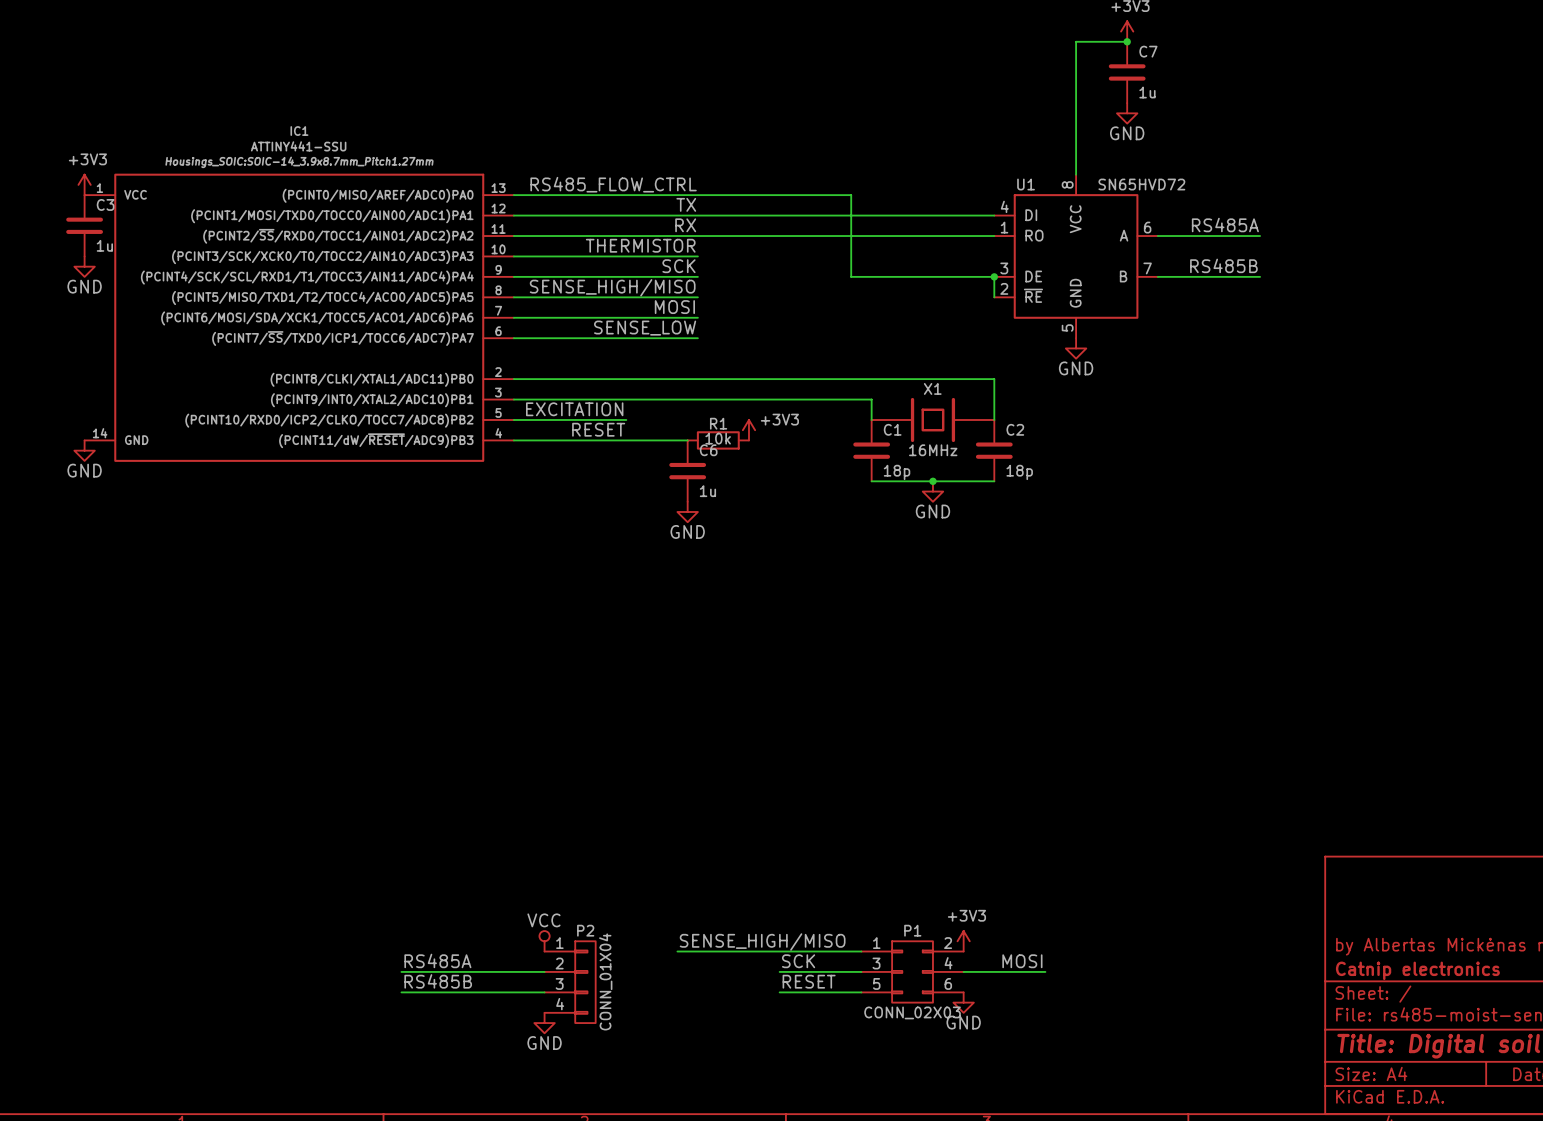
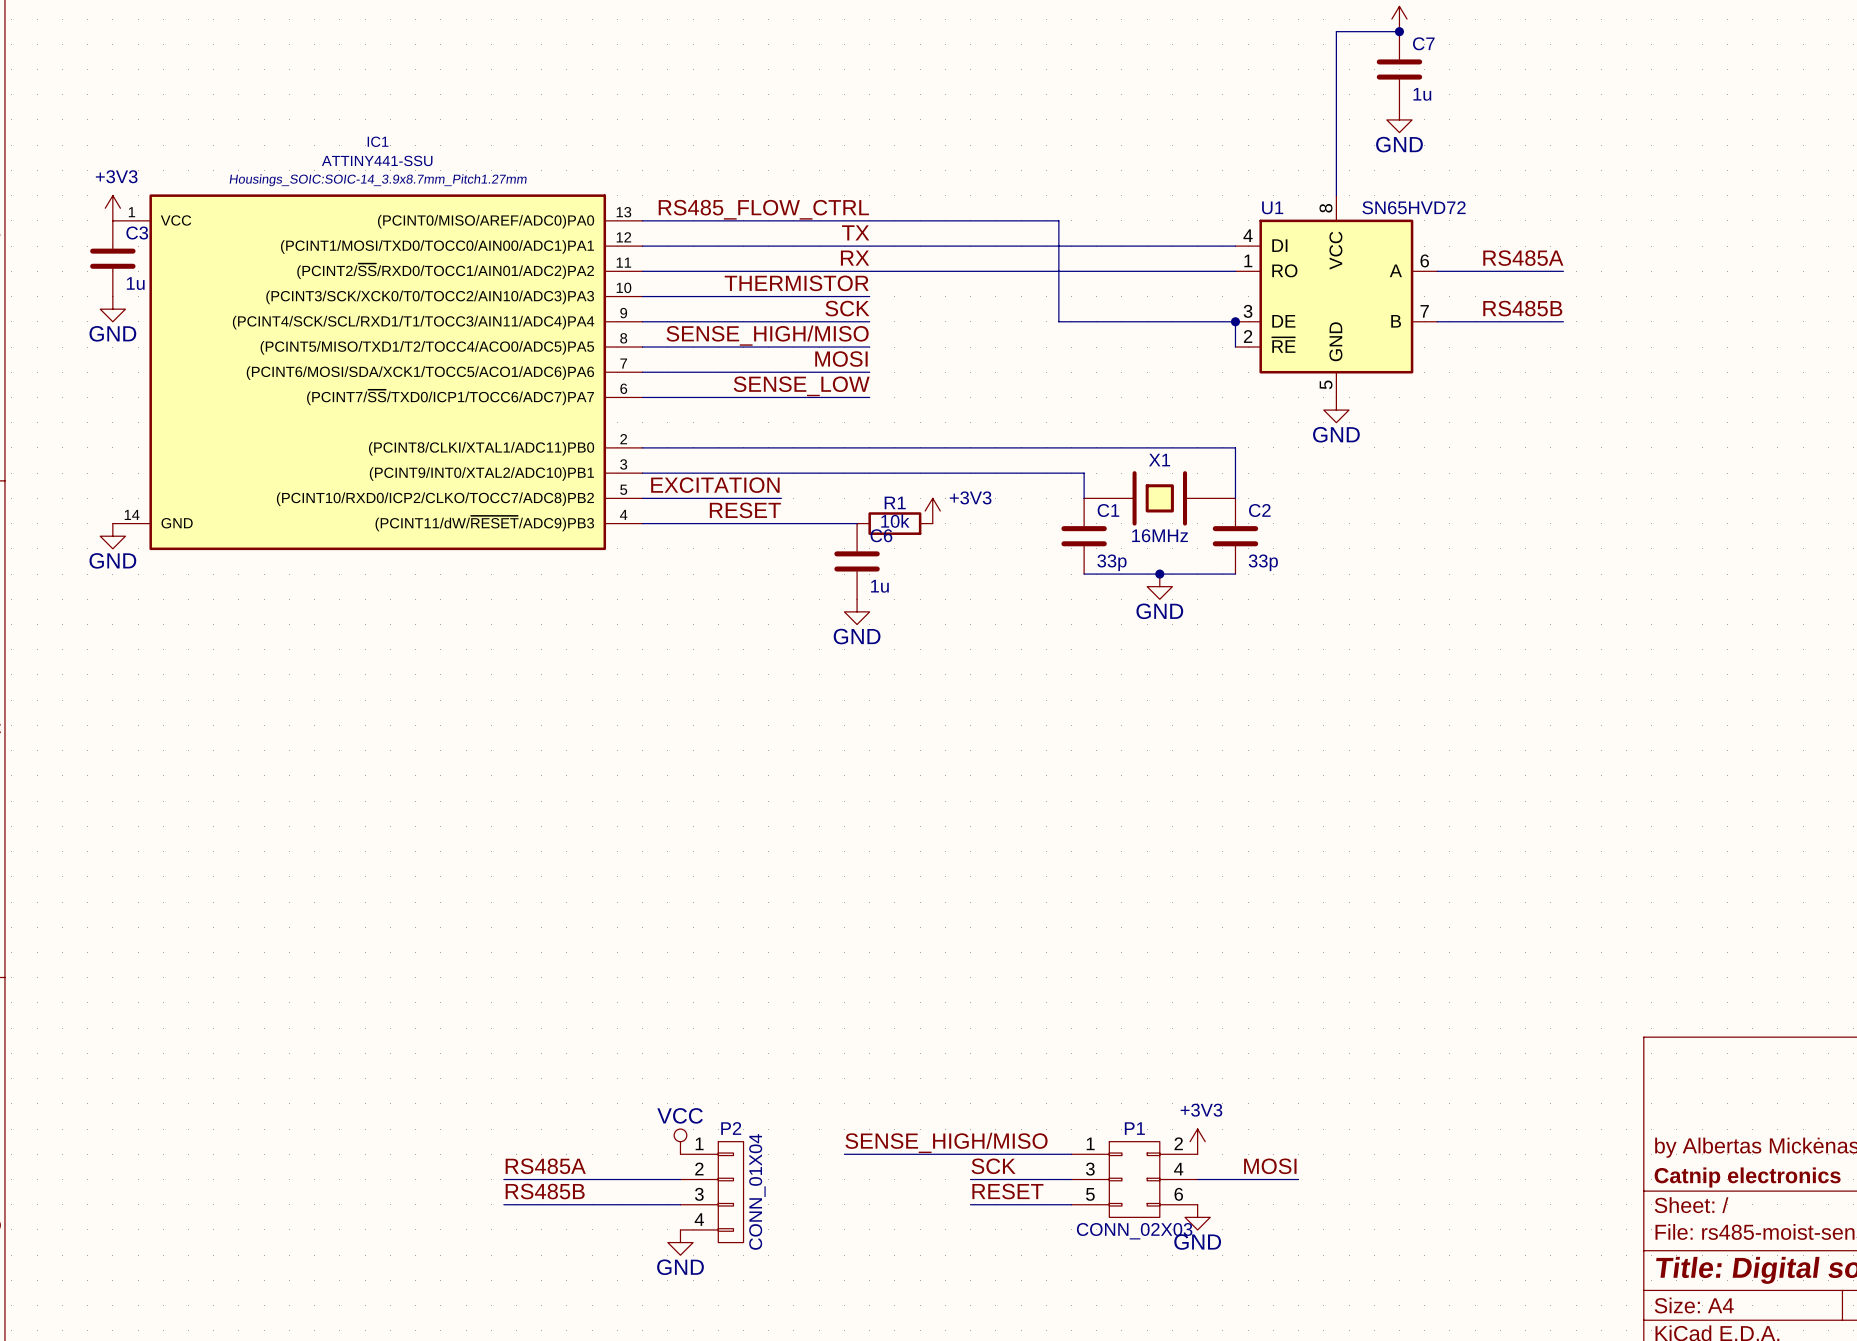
C1 value: 18p (897, 472) -> 33p (1111, 562)
C2 value: 18p (1019, 472) -> 33p (1263, 562)

